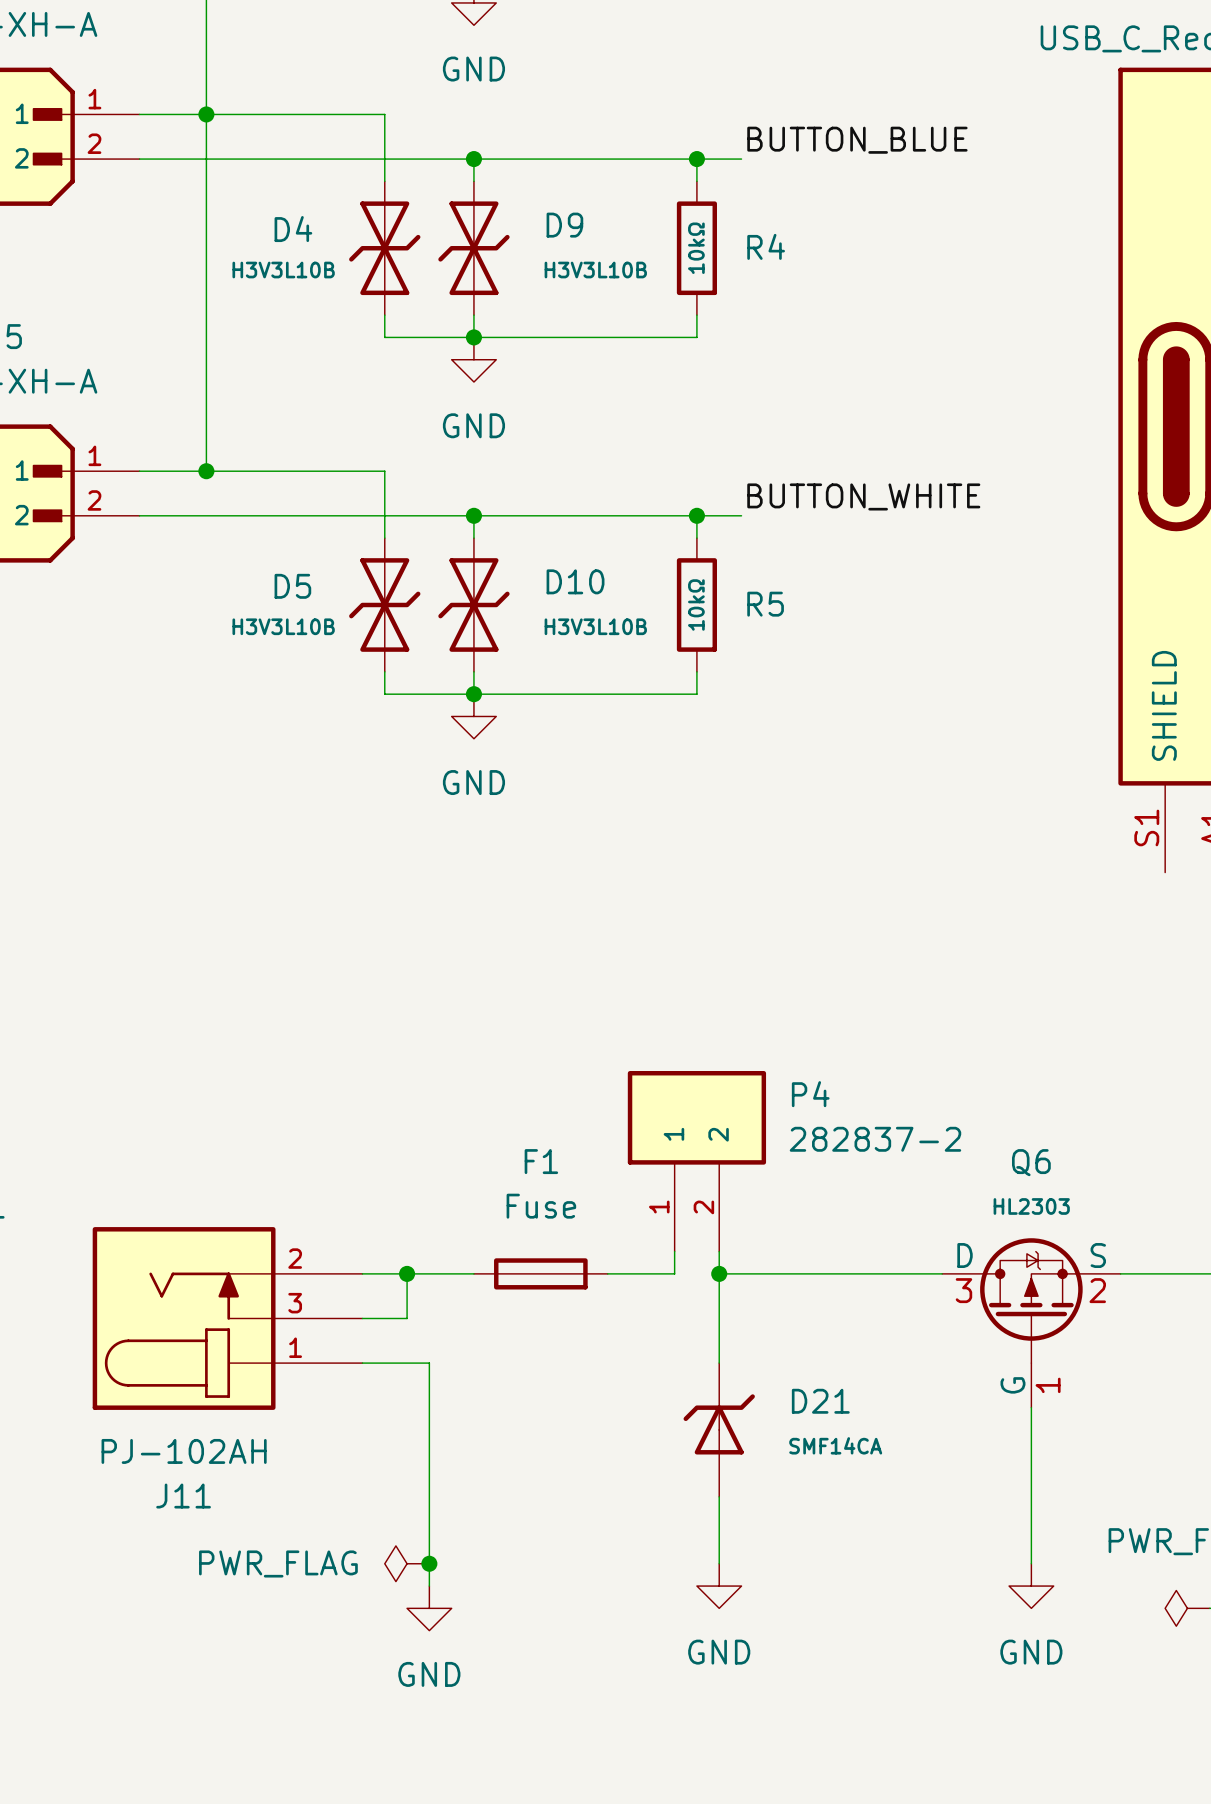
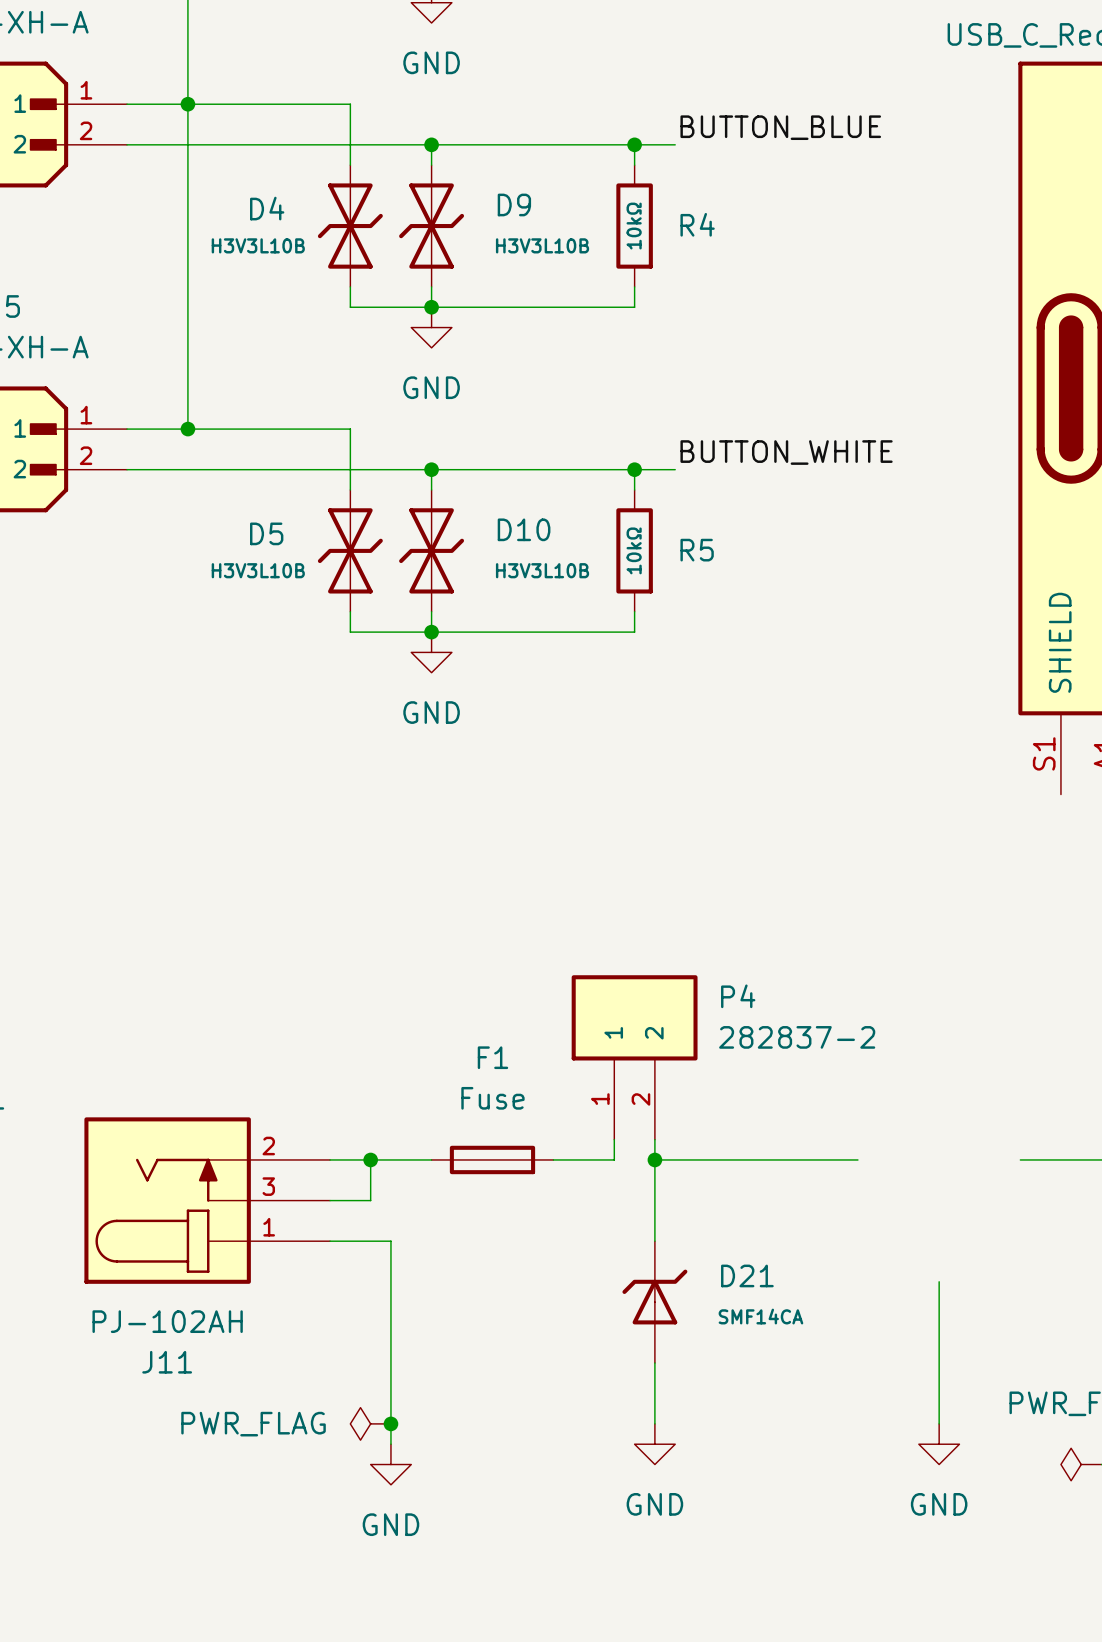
Q6: HL2303 (1031, 1322) -> none

